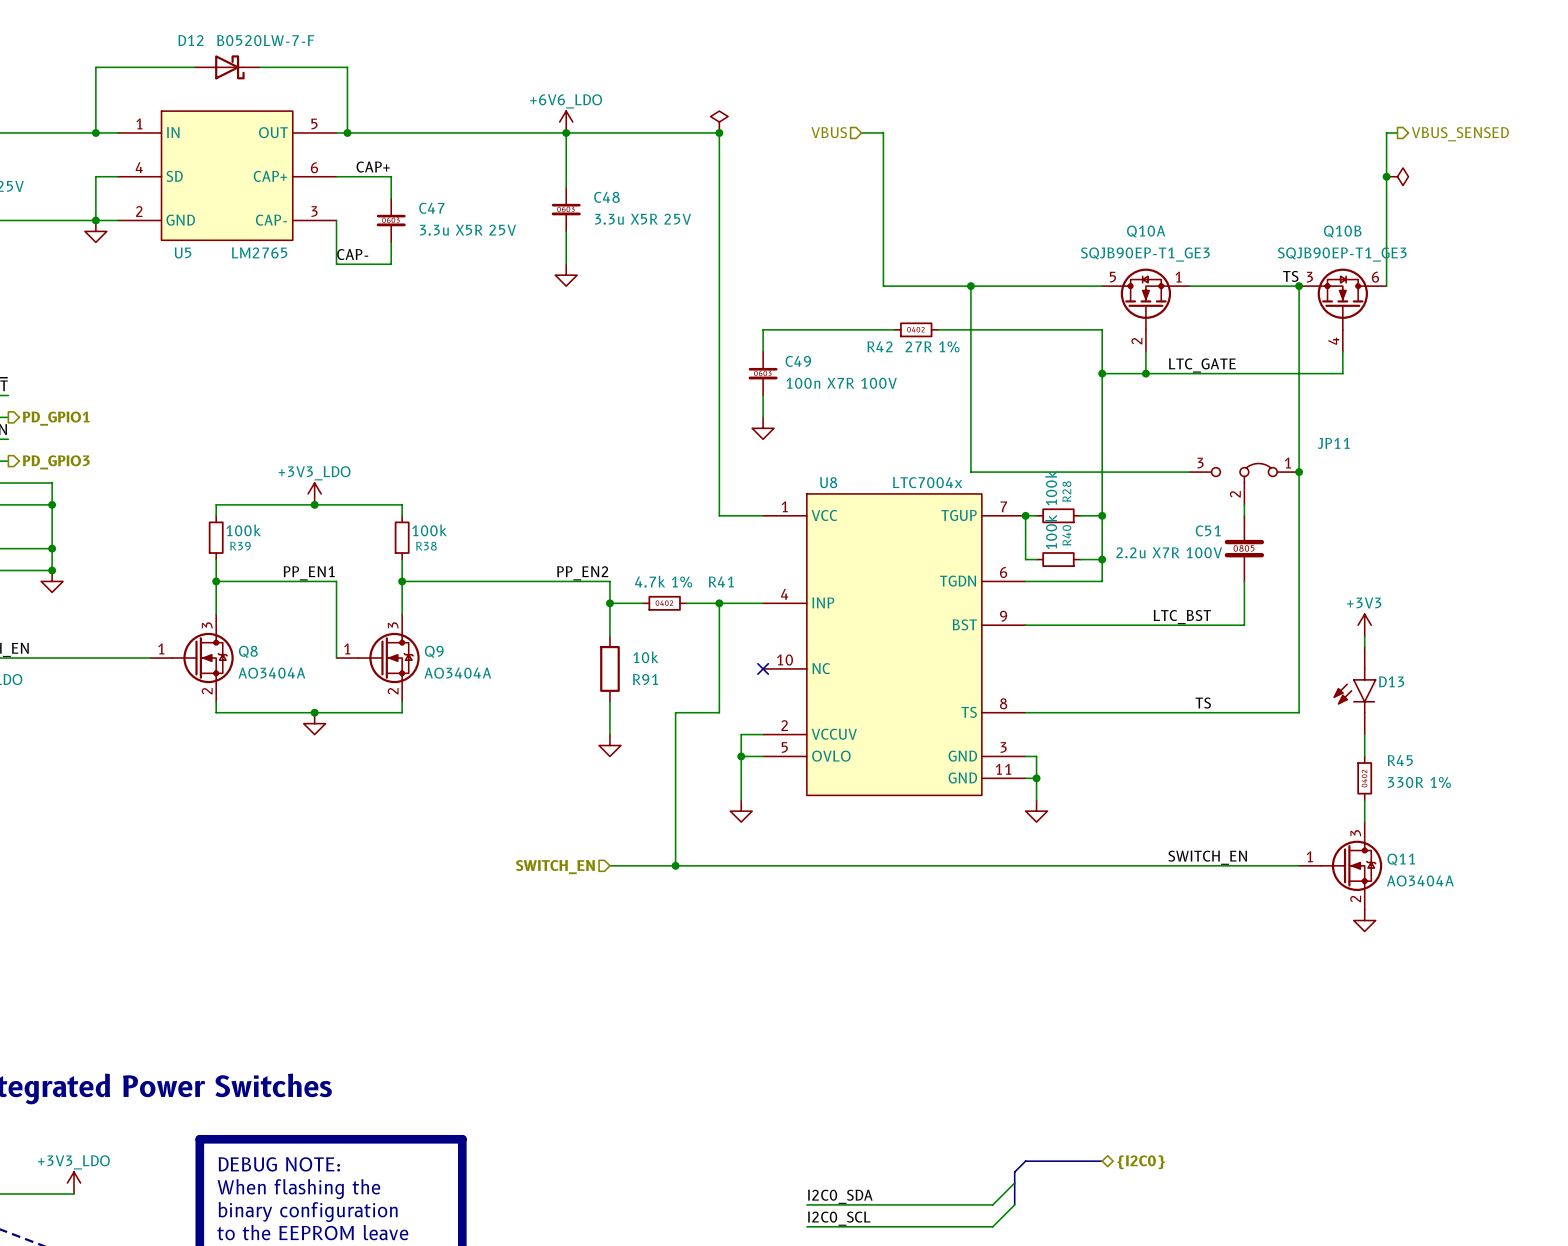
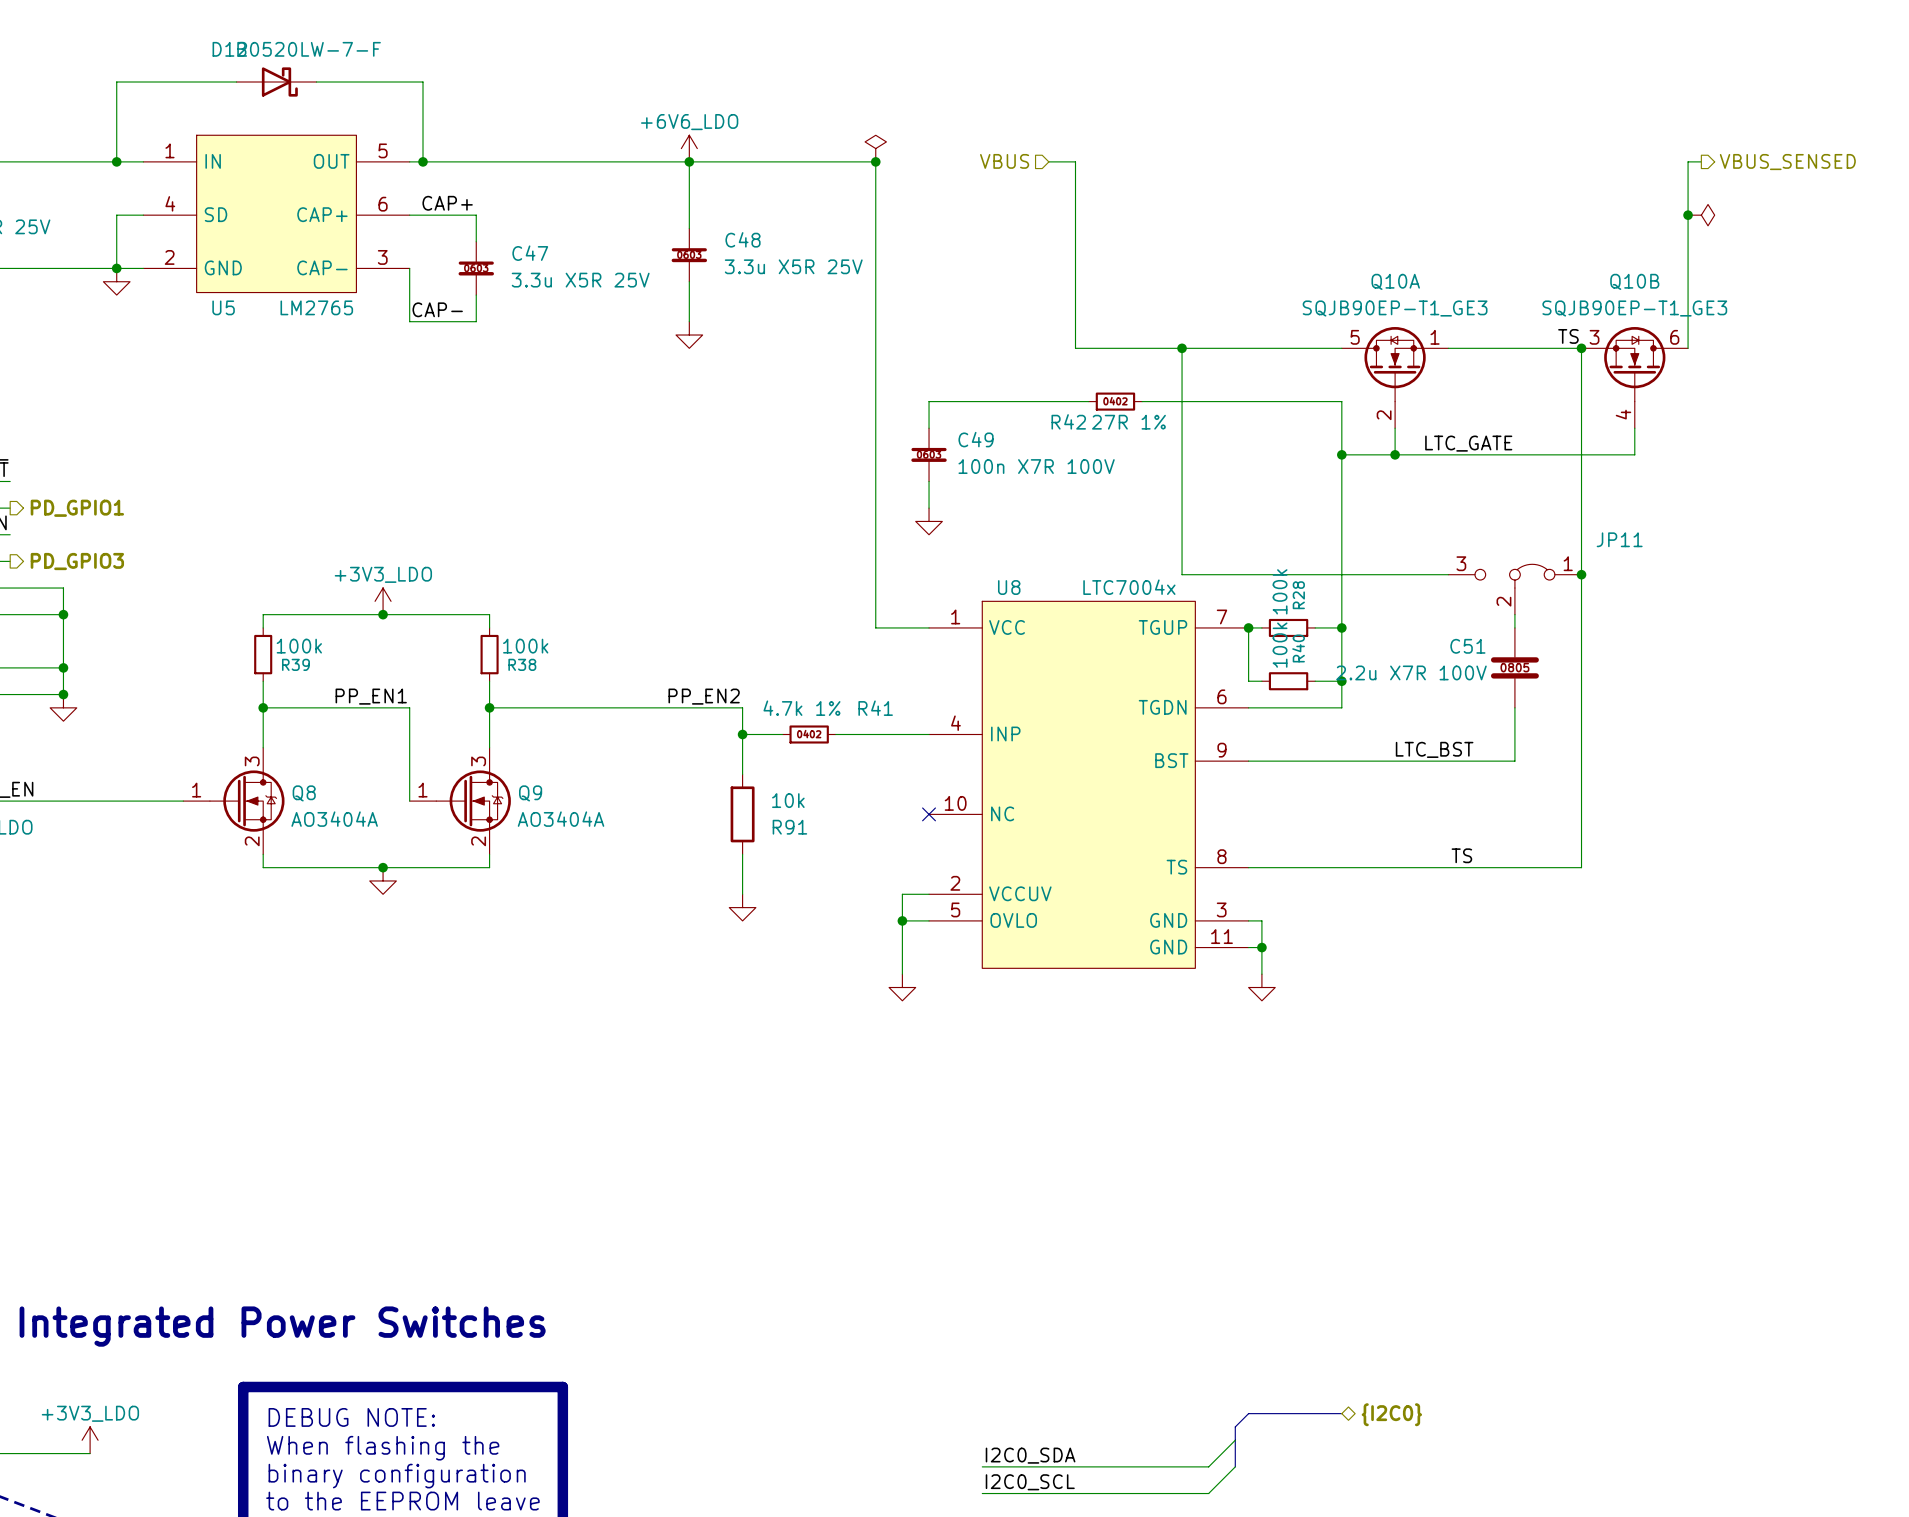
wire: (719, 603) (719, 712) (675, 712) (675, 865) -> none
junction: (719, 603) -> none
power symbol: +3V3 (1364, 625) -> none
wire: (1364, 636) (1364, 647) -> none
D13: (1354, 690) -> none
wire: (1364, 734) (1364, 756) -> none
R45: 330R 1% (1364, 778) -> none
wire: (1364, 800) (1364, 822) -> none
label: SWITCH_EN (1207, 857) -> none
wire: (609, 865) (1299, 865) -> none
junction: (675, 865) -> none
Q11: AO3404A (1340, 865) -> none
hierarchical label: SWITCH_EN (555, 867) -> none
power symbol: (1364, 920) -> none

